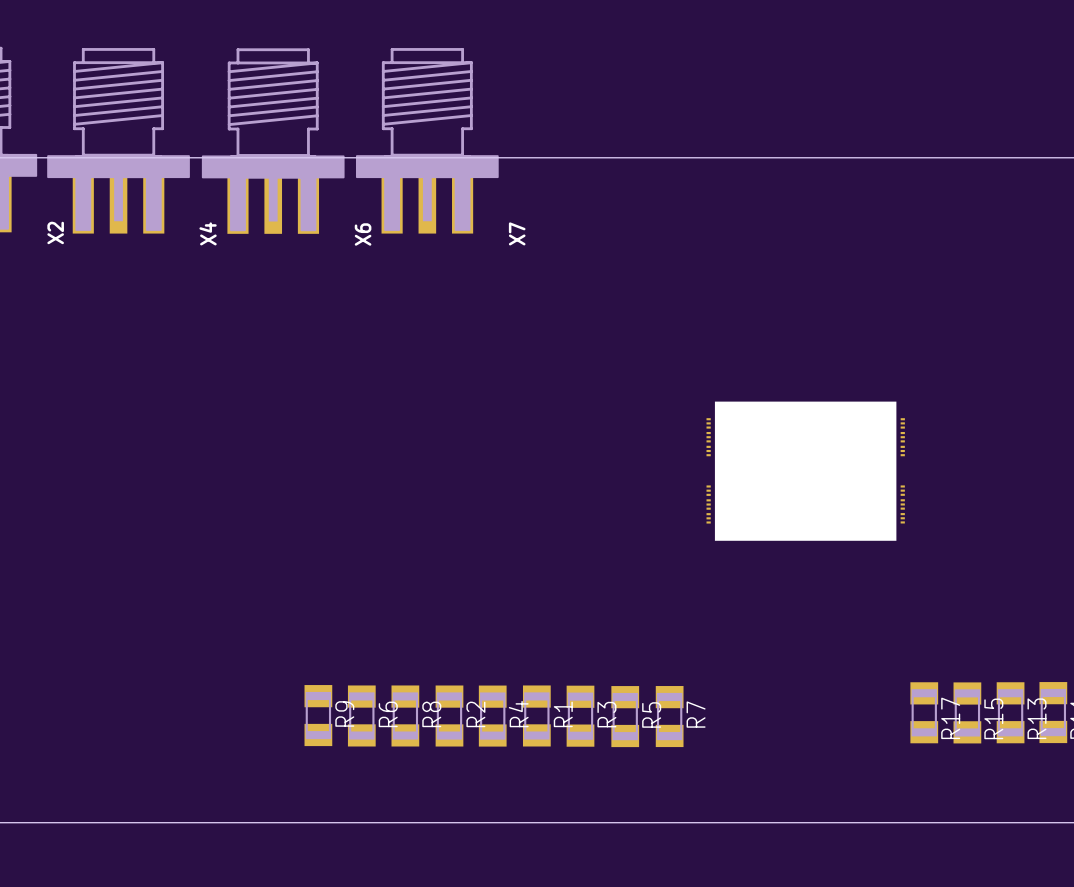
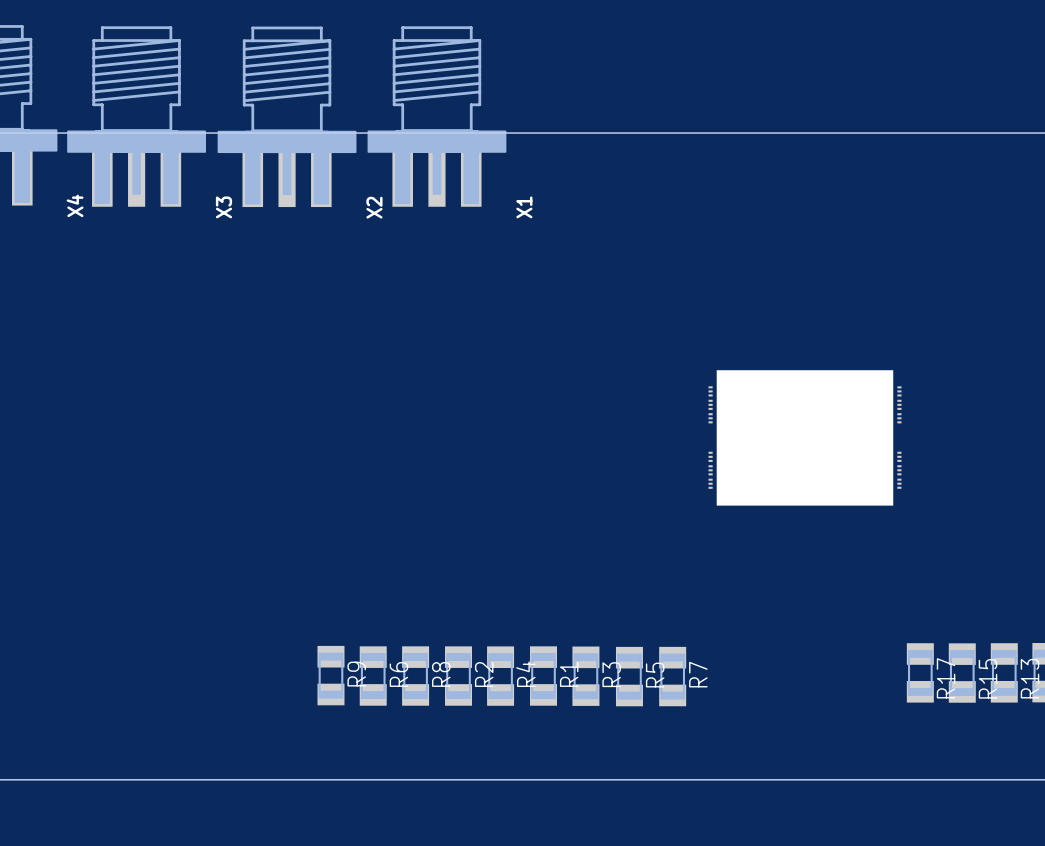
X2 name: X2 (55, 232) -> X4 (75, 205)
X4 name: X4 (208, 233) -> X3 (223, 207)
X7 name: X7 (517, 233) -> X1 (524, 207)
X6 name: X6 (363, 234) -> X2 (374, 207)

